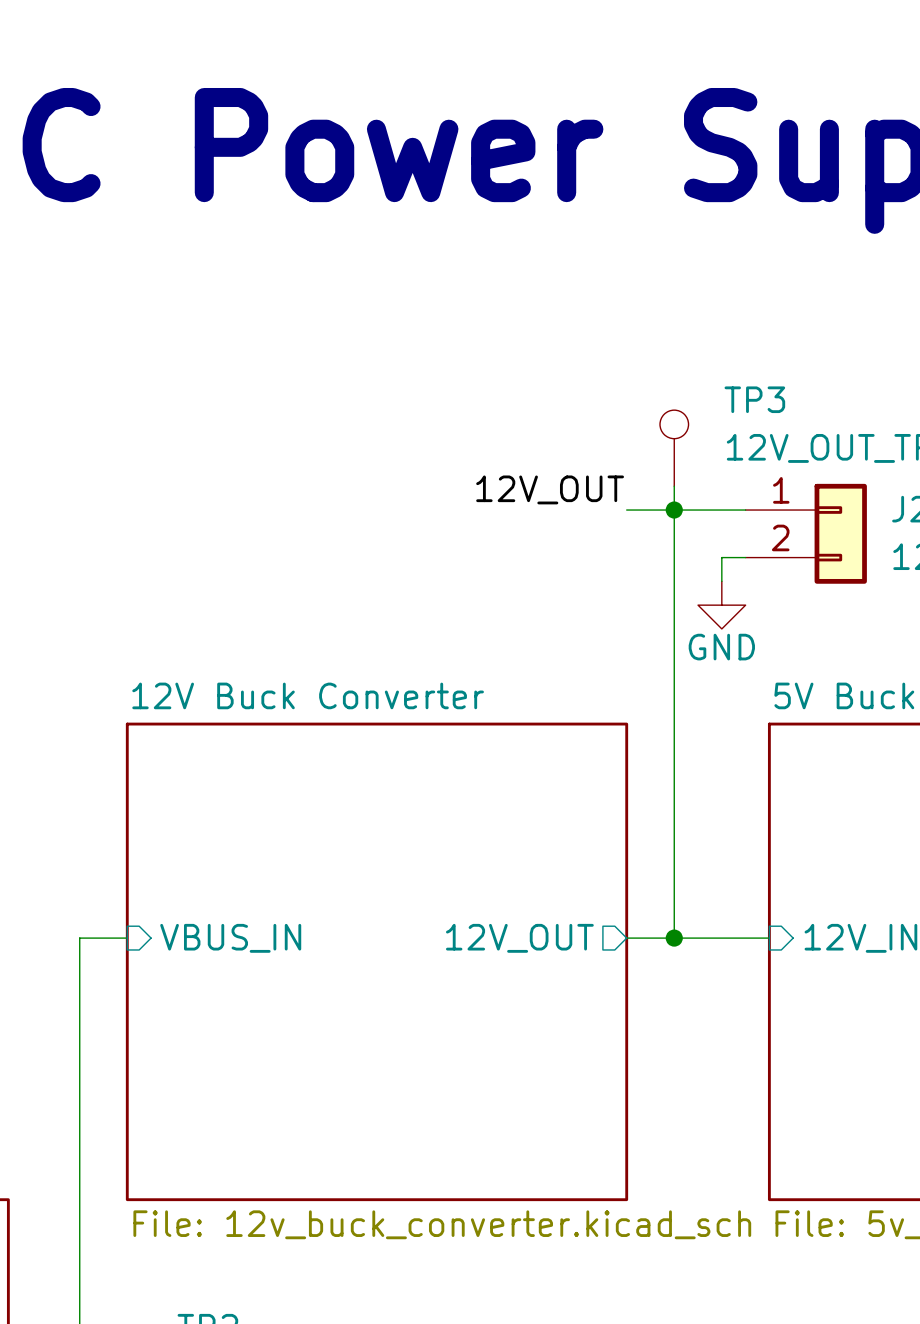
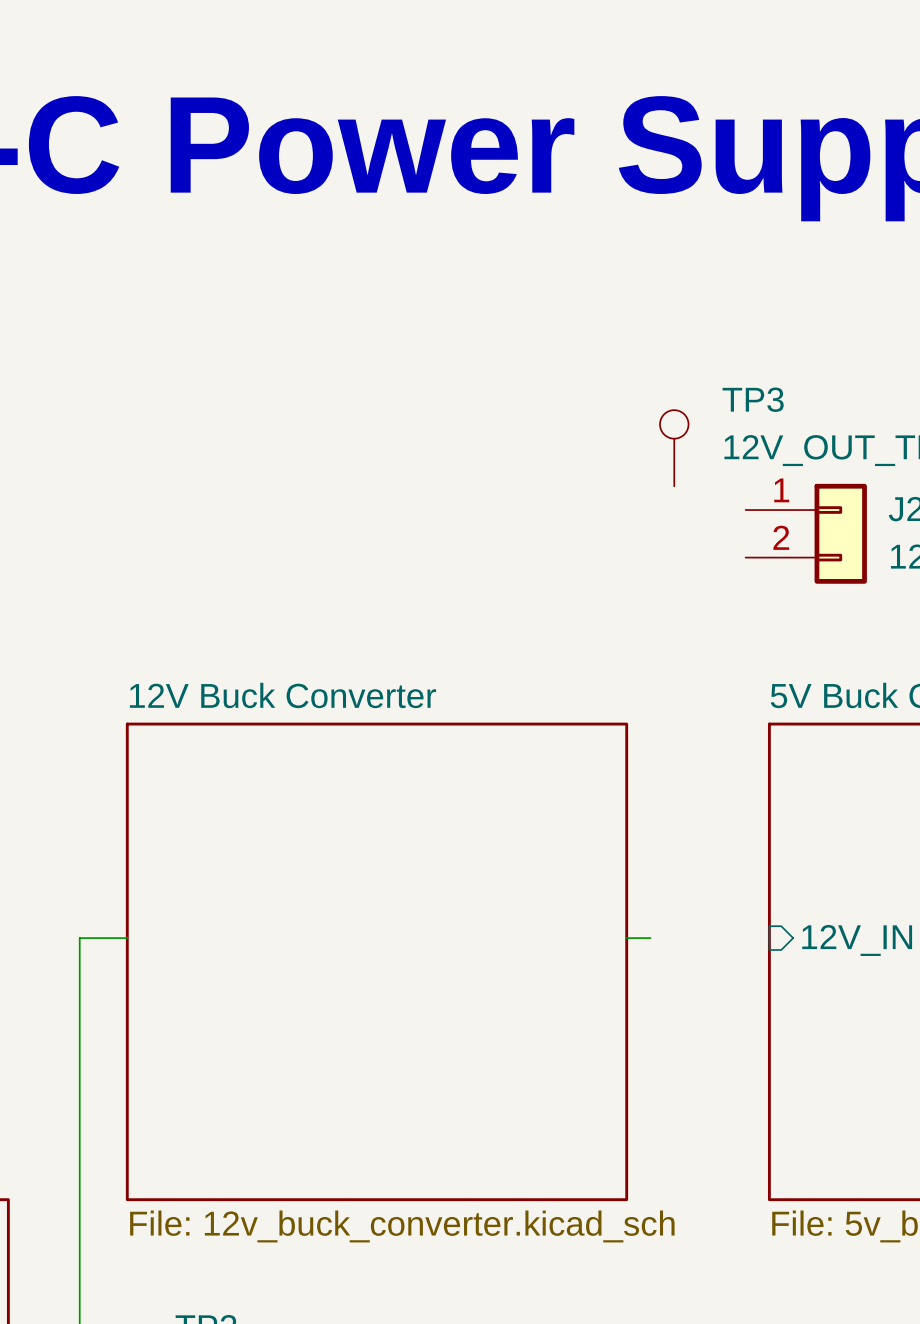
wire: (674, 486) (674, 938) -> none
label: 12V_OUT (550, 489) -> none
wire: (626, 510) (745, 510) -> none
junction: (674, 510) -> none
wire: (745, 557) (721, 557) (721, 581) -> none
power symbol: GND (721, 605) -> none
sheet pin: VBUS_IN (230, 938) -> none
sheet pin: 12V_OUT (519, 938) -> none
wire: (650, 938) (769, 938) -> none
junction: (674, 938) -> none

